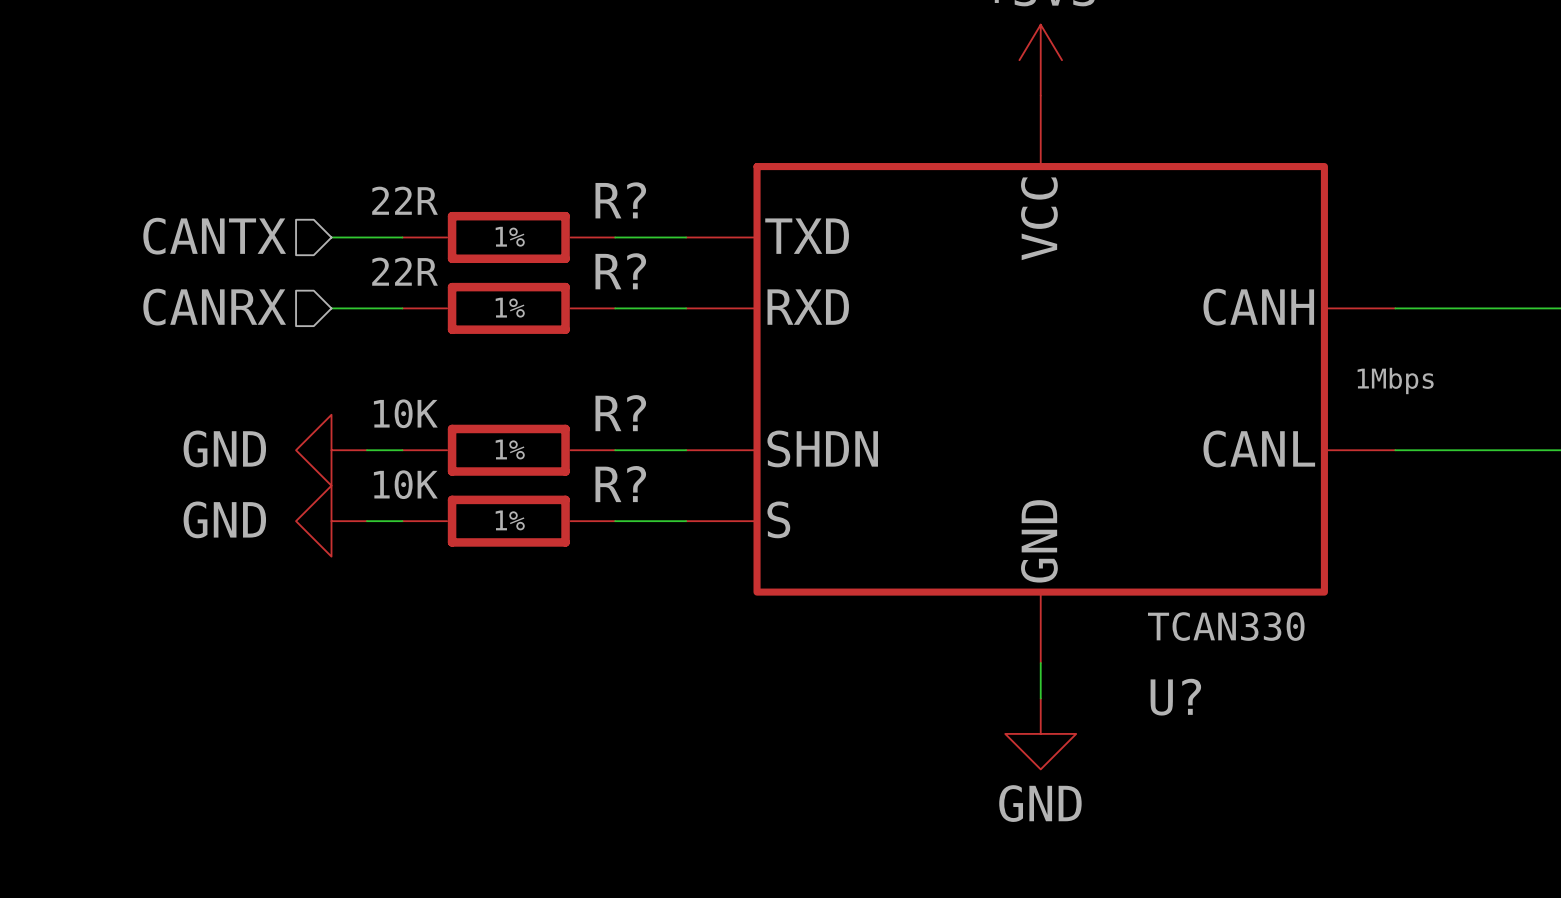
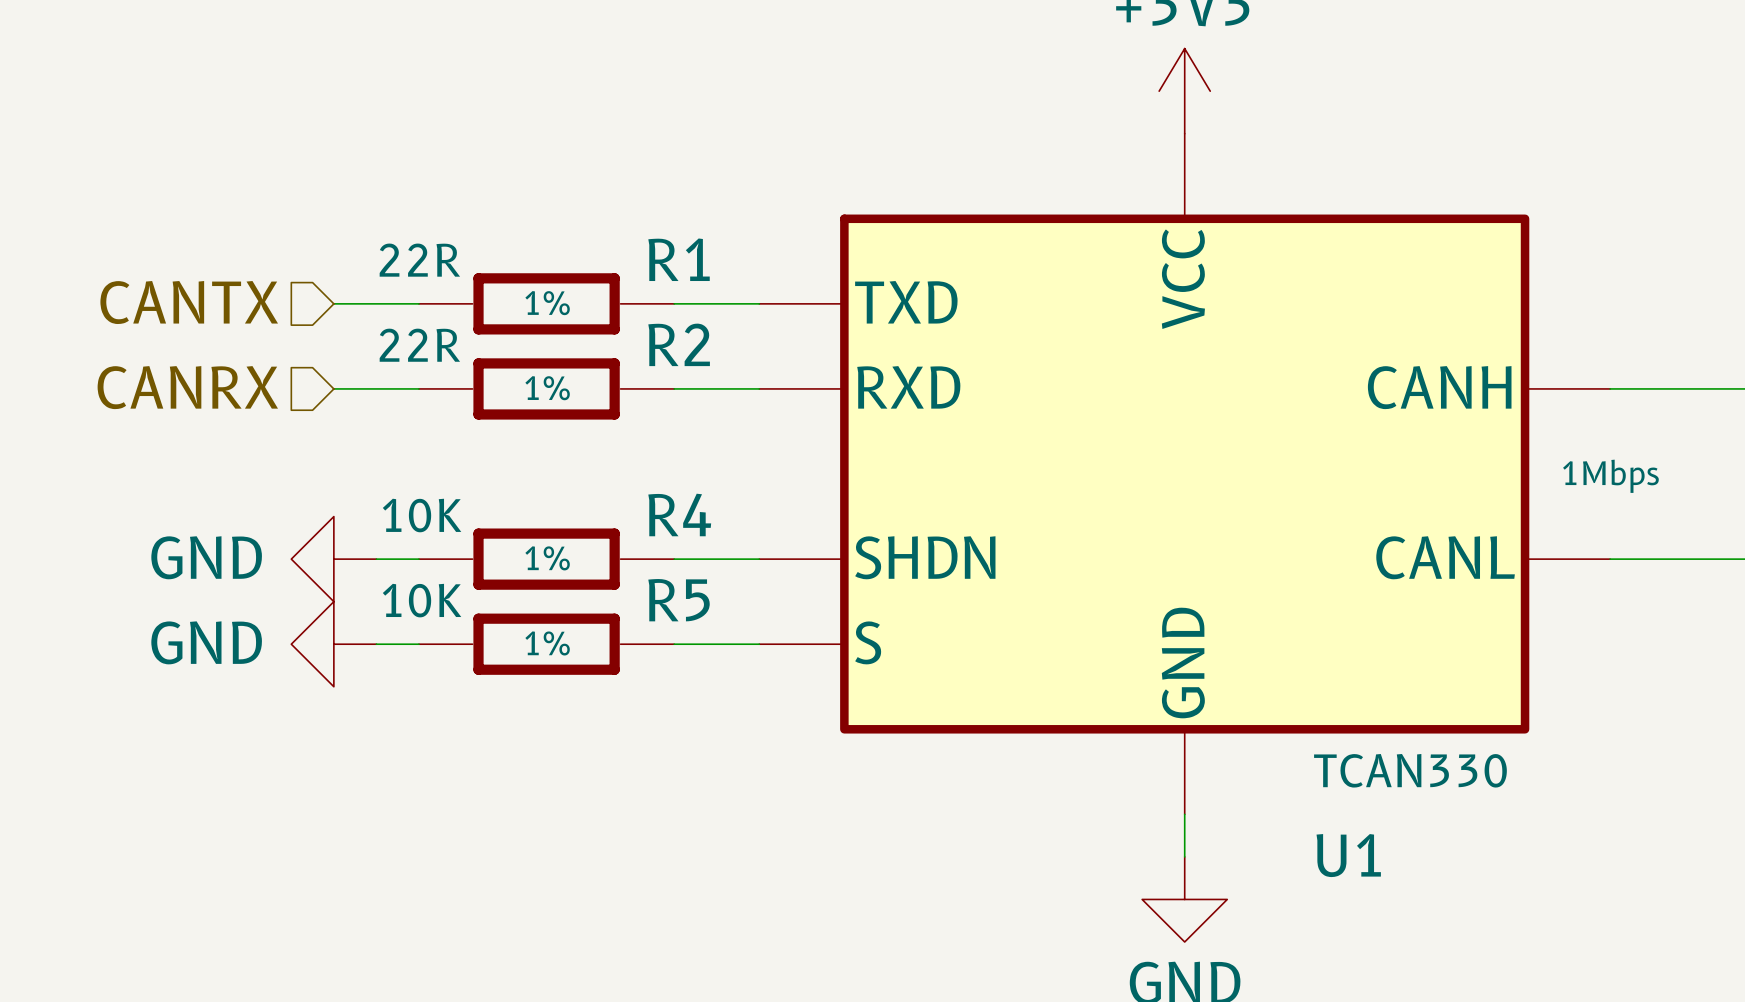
R? name: R? (620, 200) -> R1 (679, 259)
R? name: R? (620, 271) -> R2 (679, 344)
R? name: R? (620, 413) -> R4 (679, 514)
R? name: R? (620, 484) -> R5 (679, 600)
U? name: U? (1175, 697) -> U1 (1348, 855)

